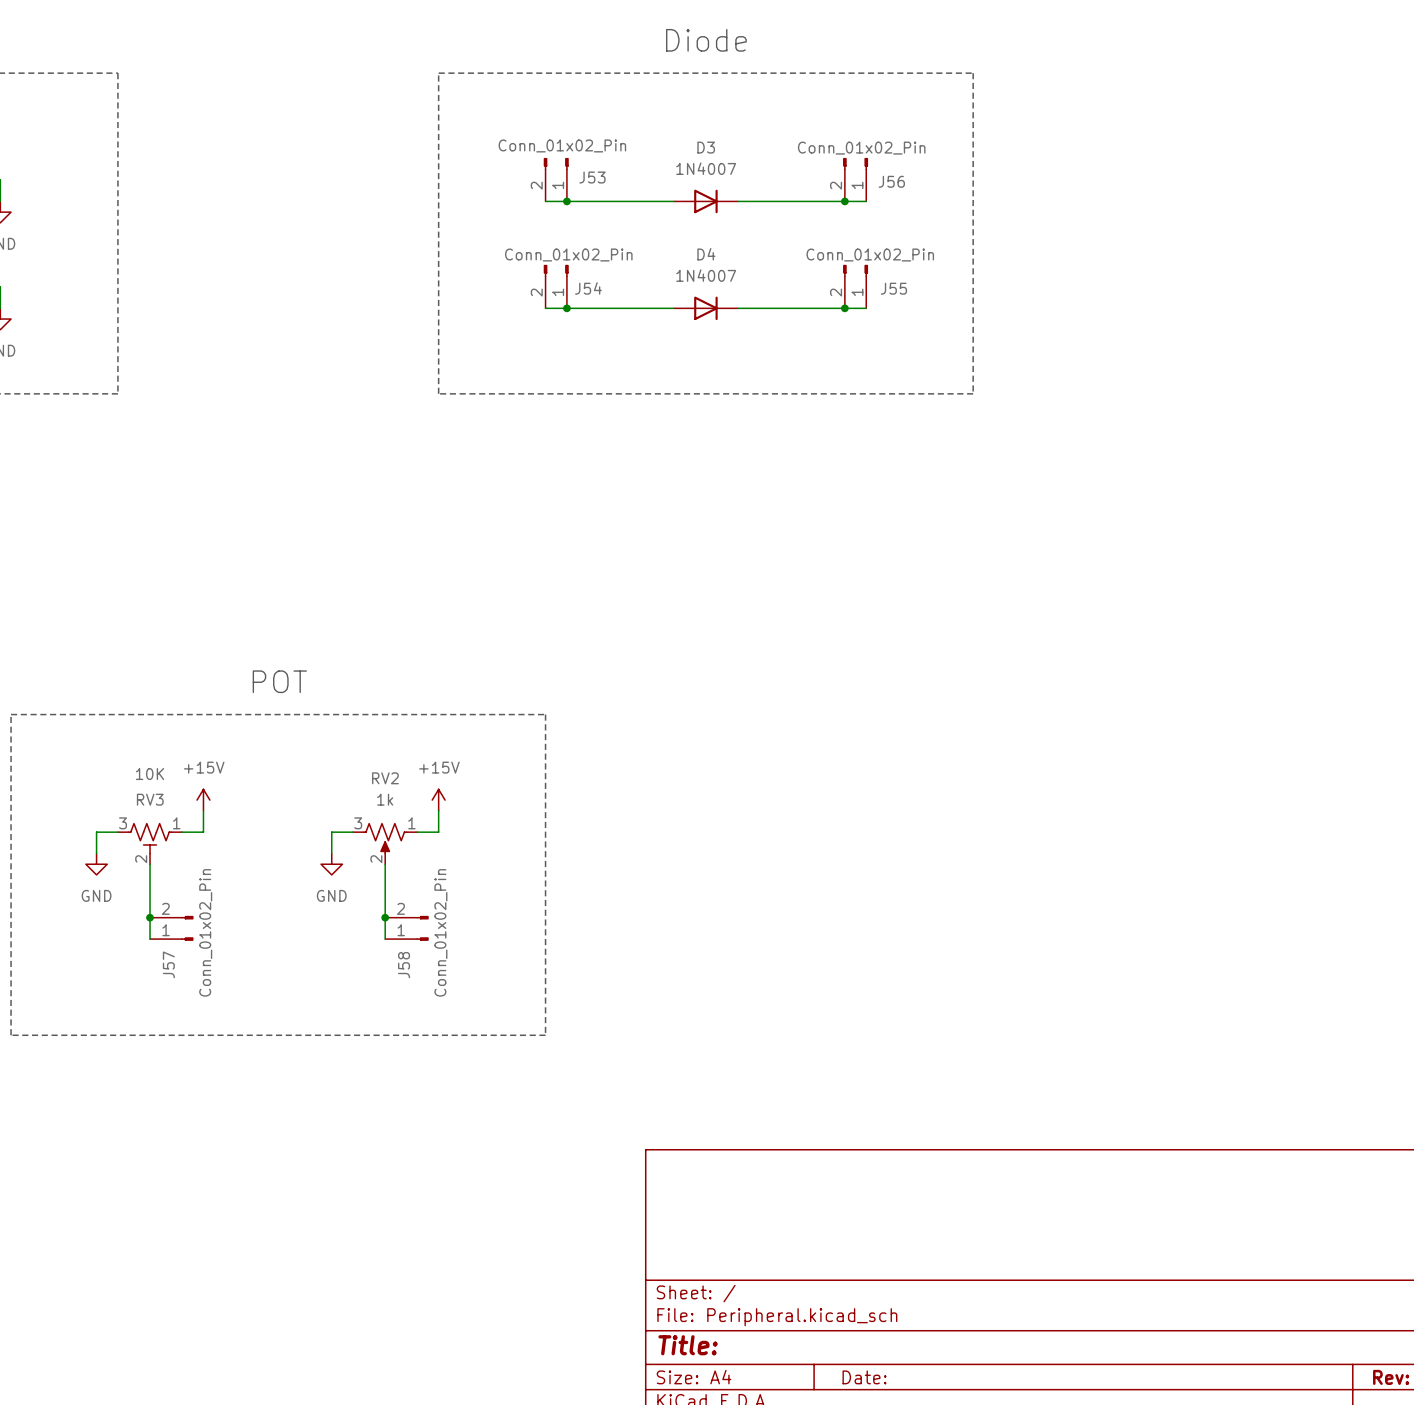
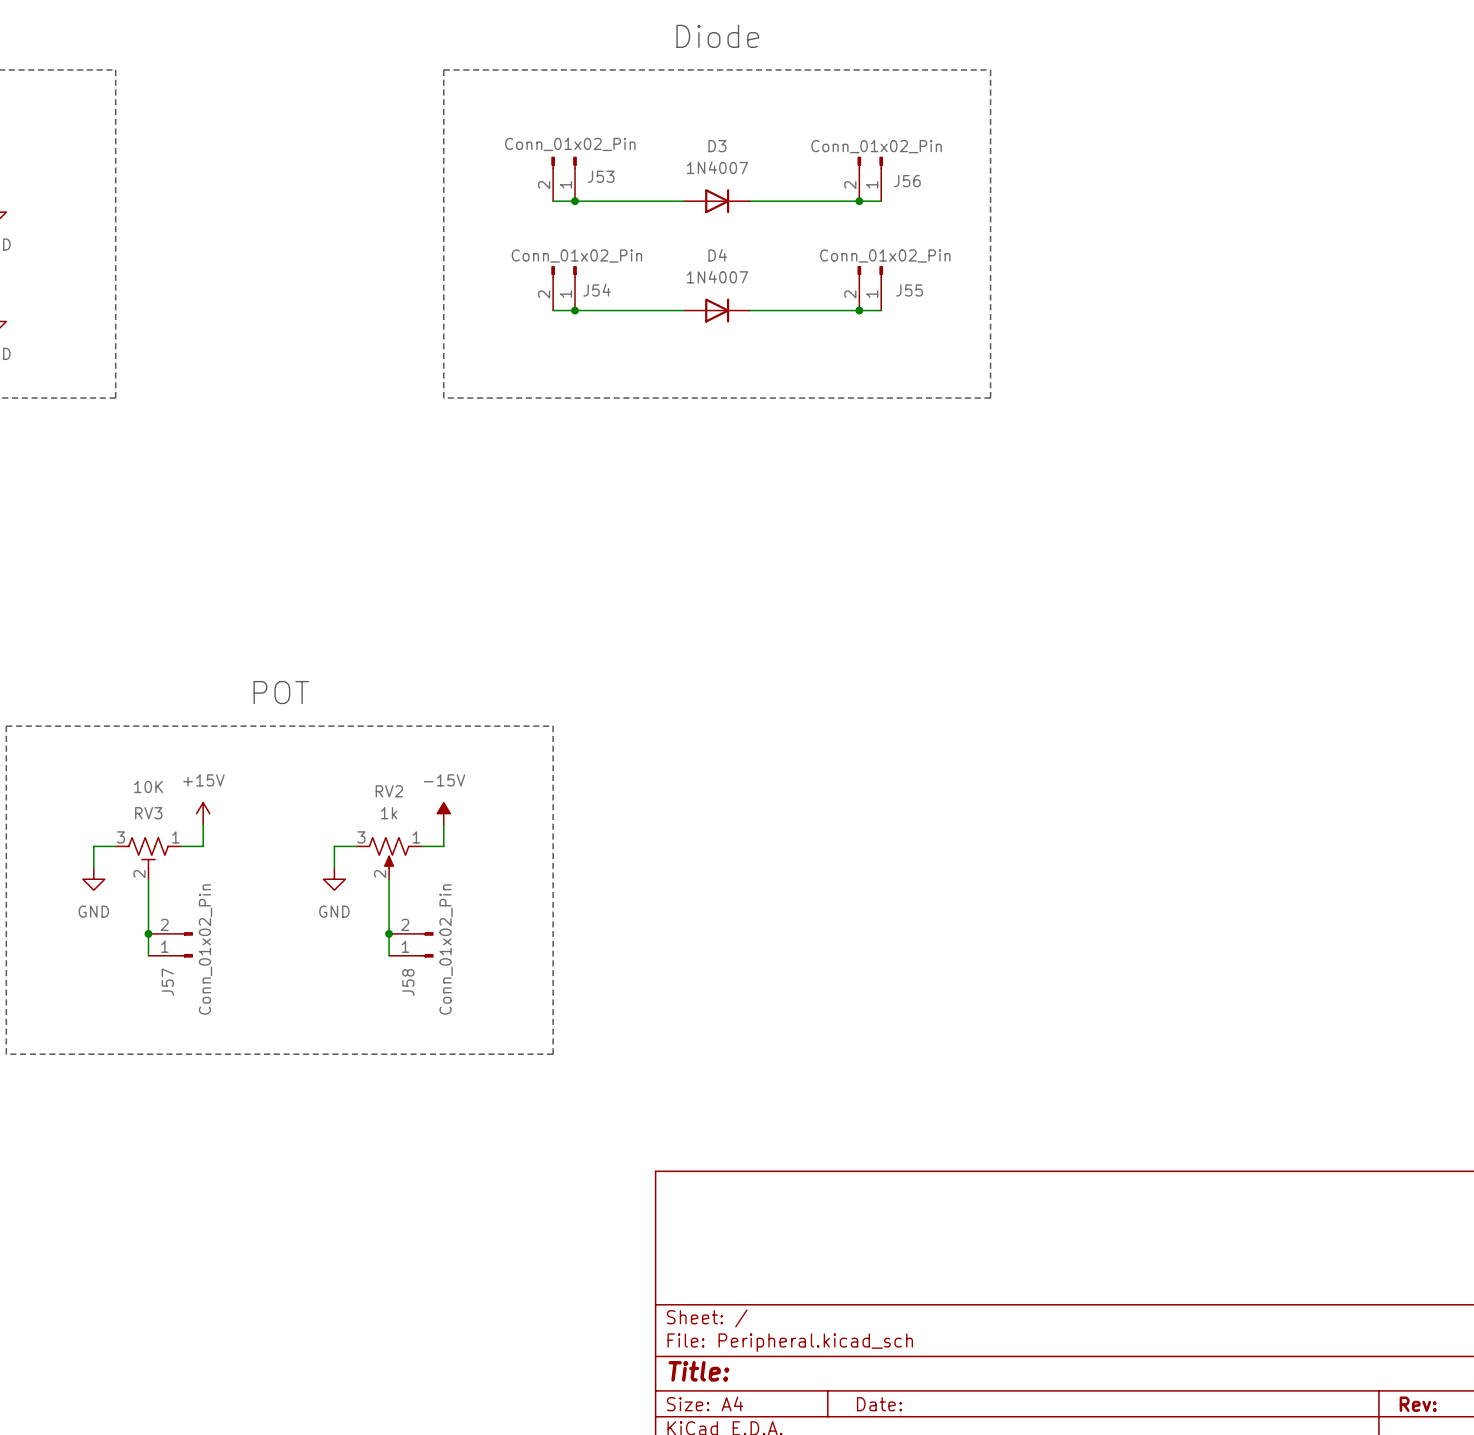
power symbol: +15V (438, 800) -> -15V (443, 813)

